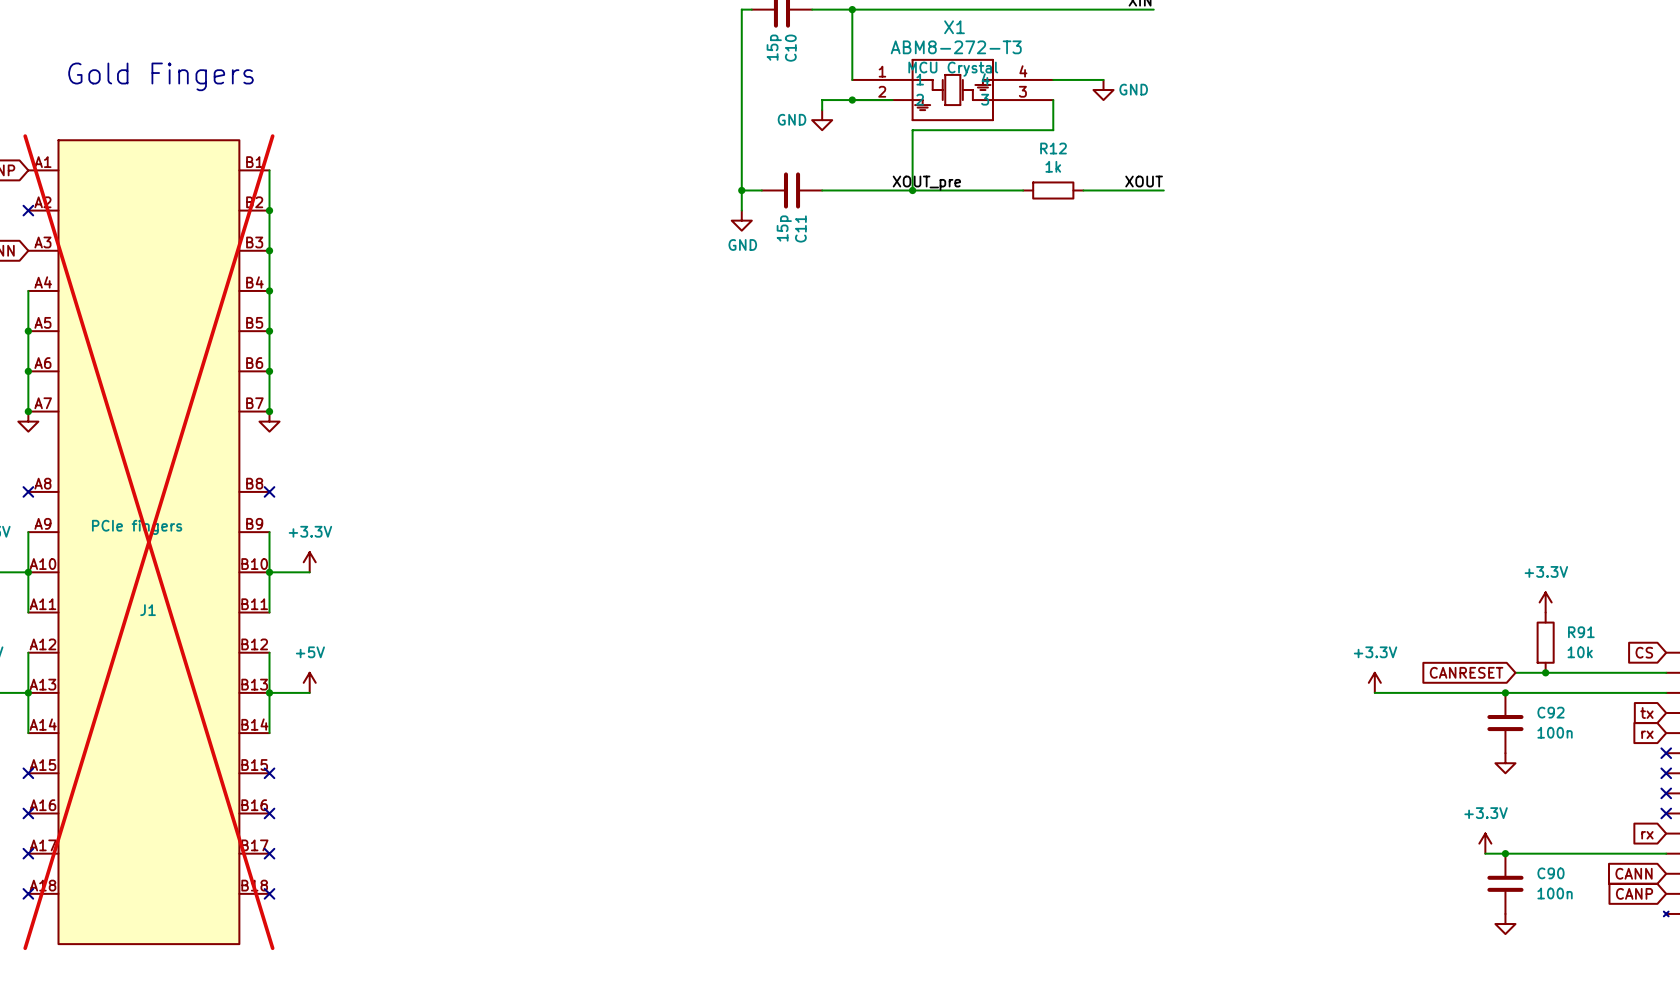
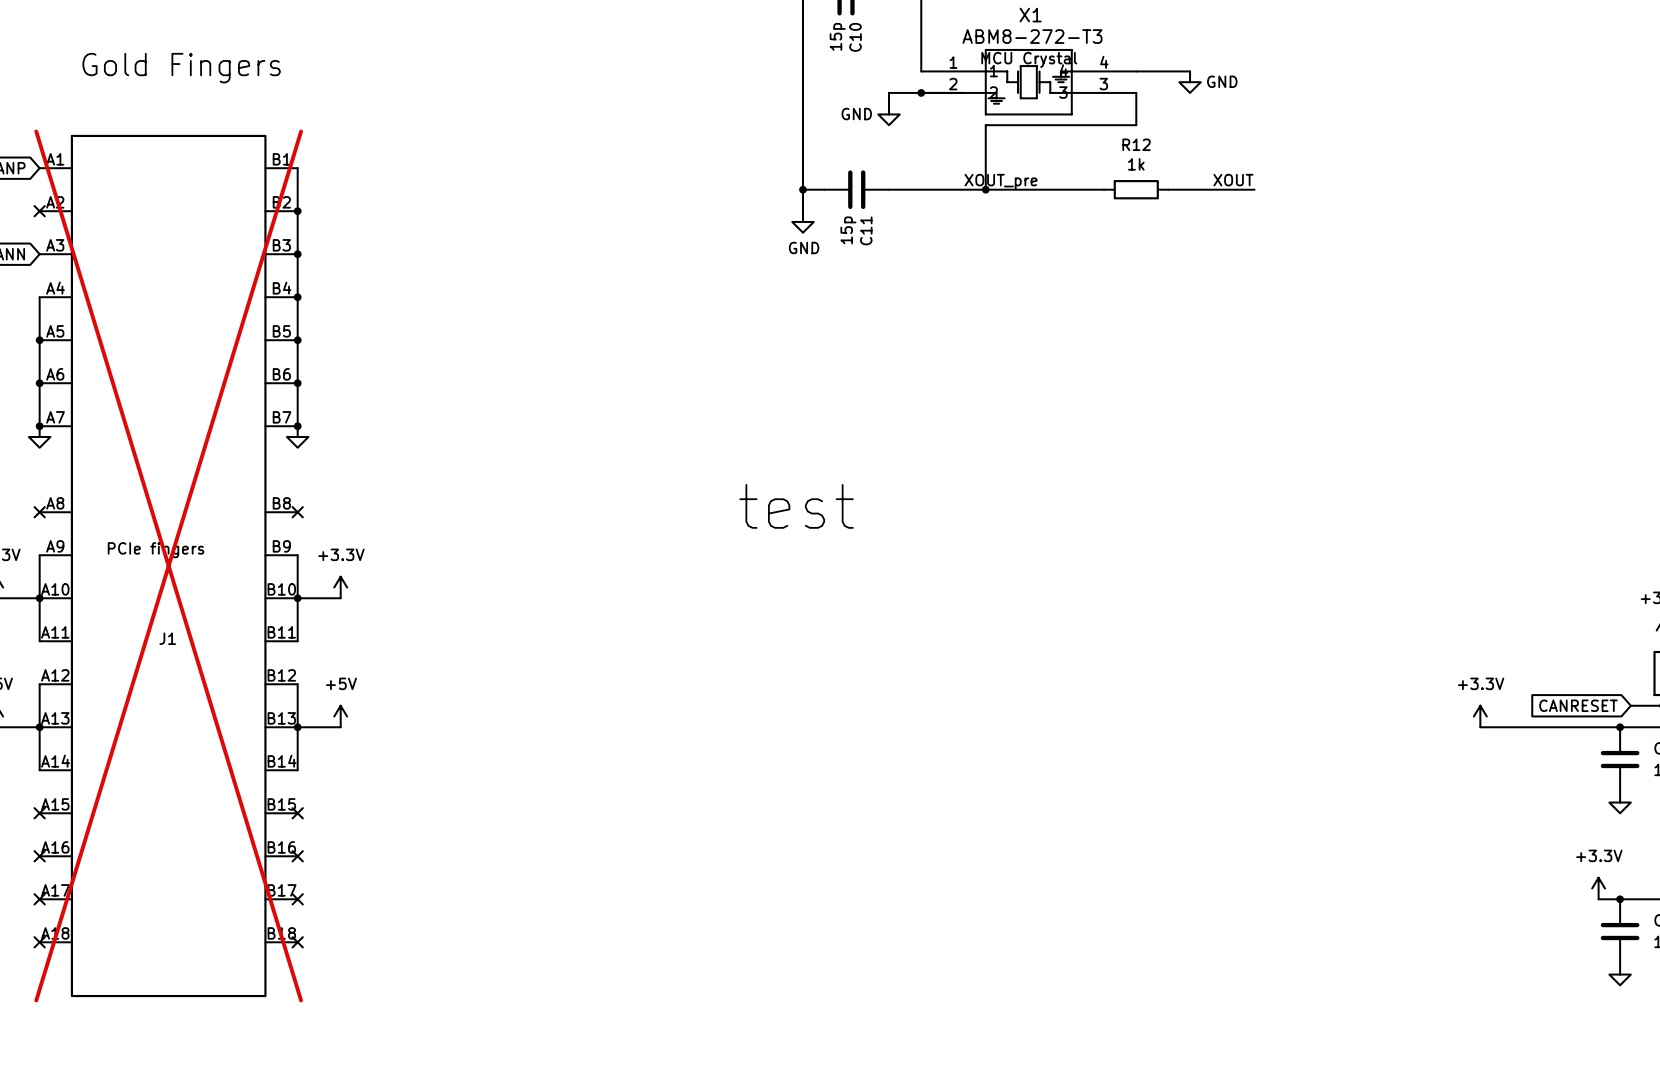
text: none -> test (796, 506)

